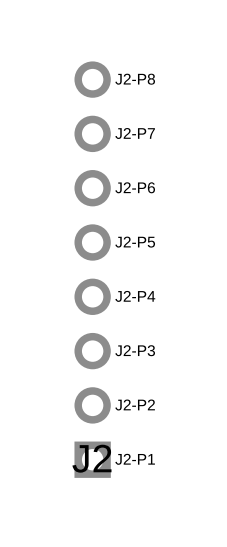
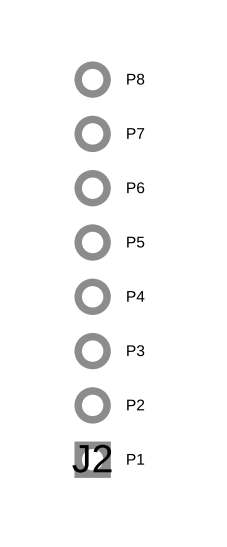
text: J2-P8 (135, 79) -> P8 (135, 79)
text: J2-P7 (135, 133) -> P7 (135, 133)
text: J2-P6 (135, 187) -> P6 (135, 187)
text: J2-P5 (135, 242) -> P5 (135, 242)
text: J2-P4 (135, 296) -> P4 (135, 296)
text: J2-P3 (135, 350) -> P3 (135, 350)
text: J2-P2 (135, 405) -> P2 (135, 404)
text: J2-P1 (135, 459) -> P1 (135, 459)

